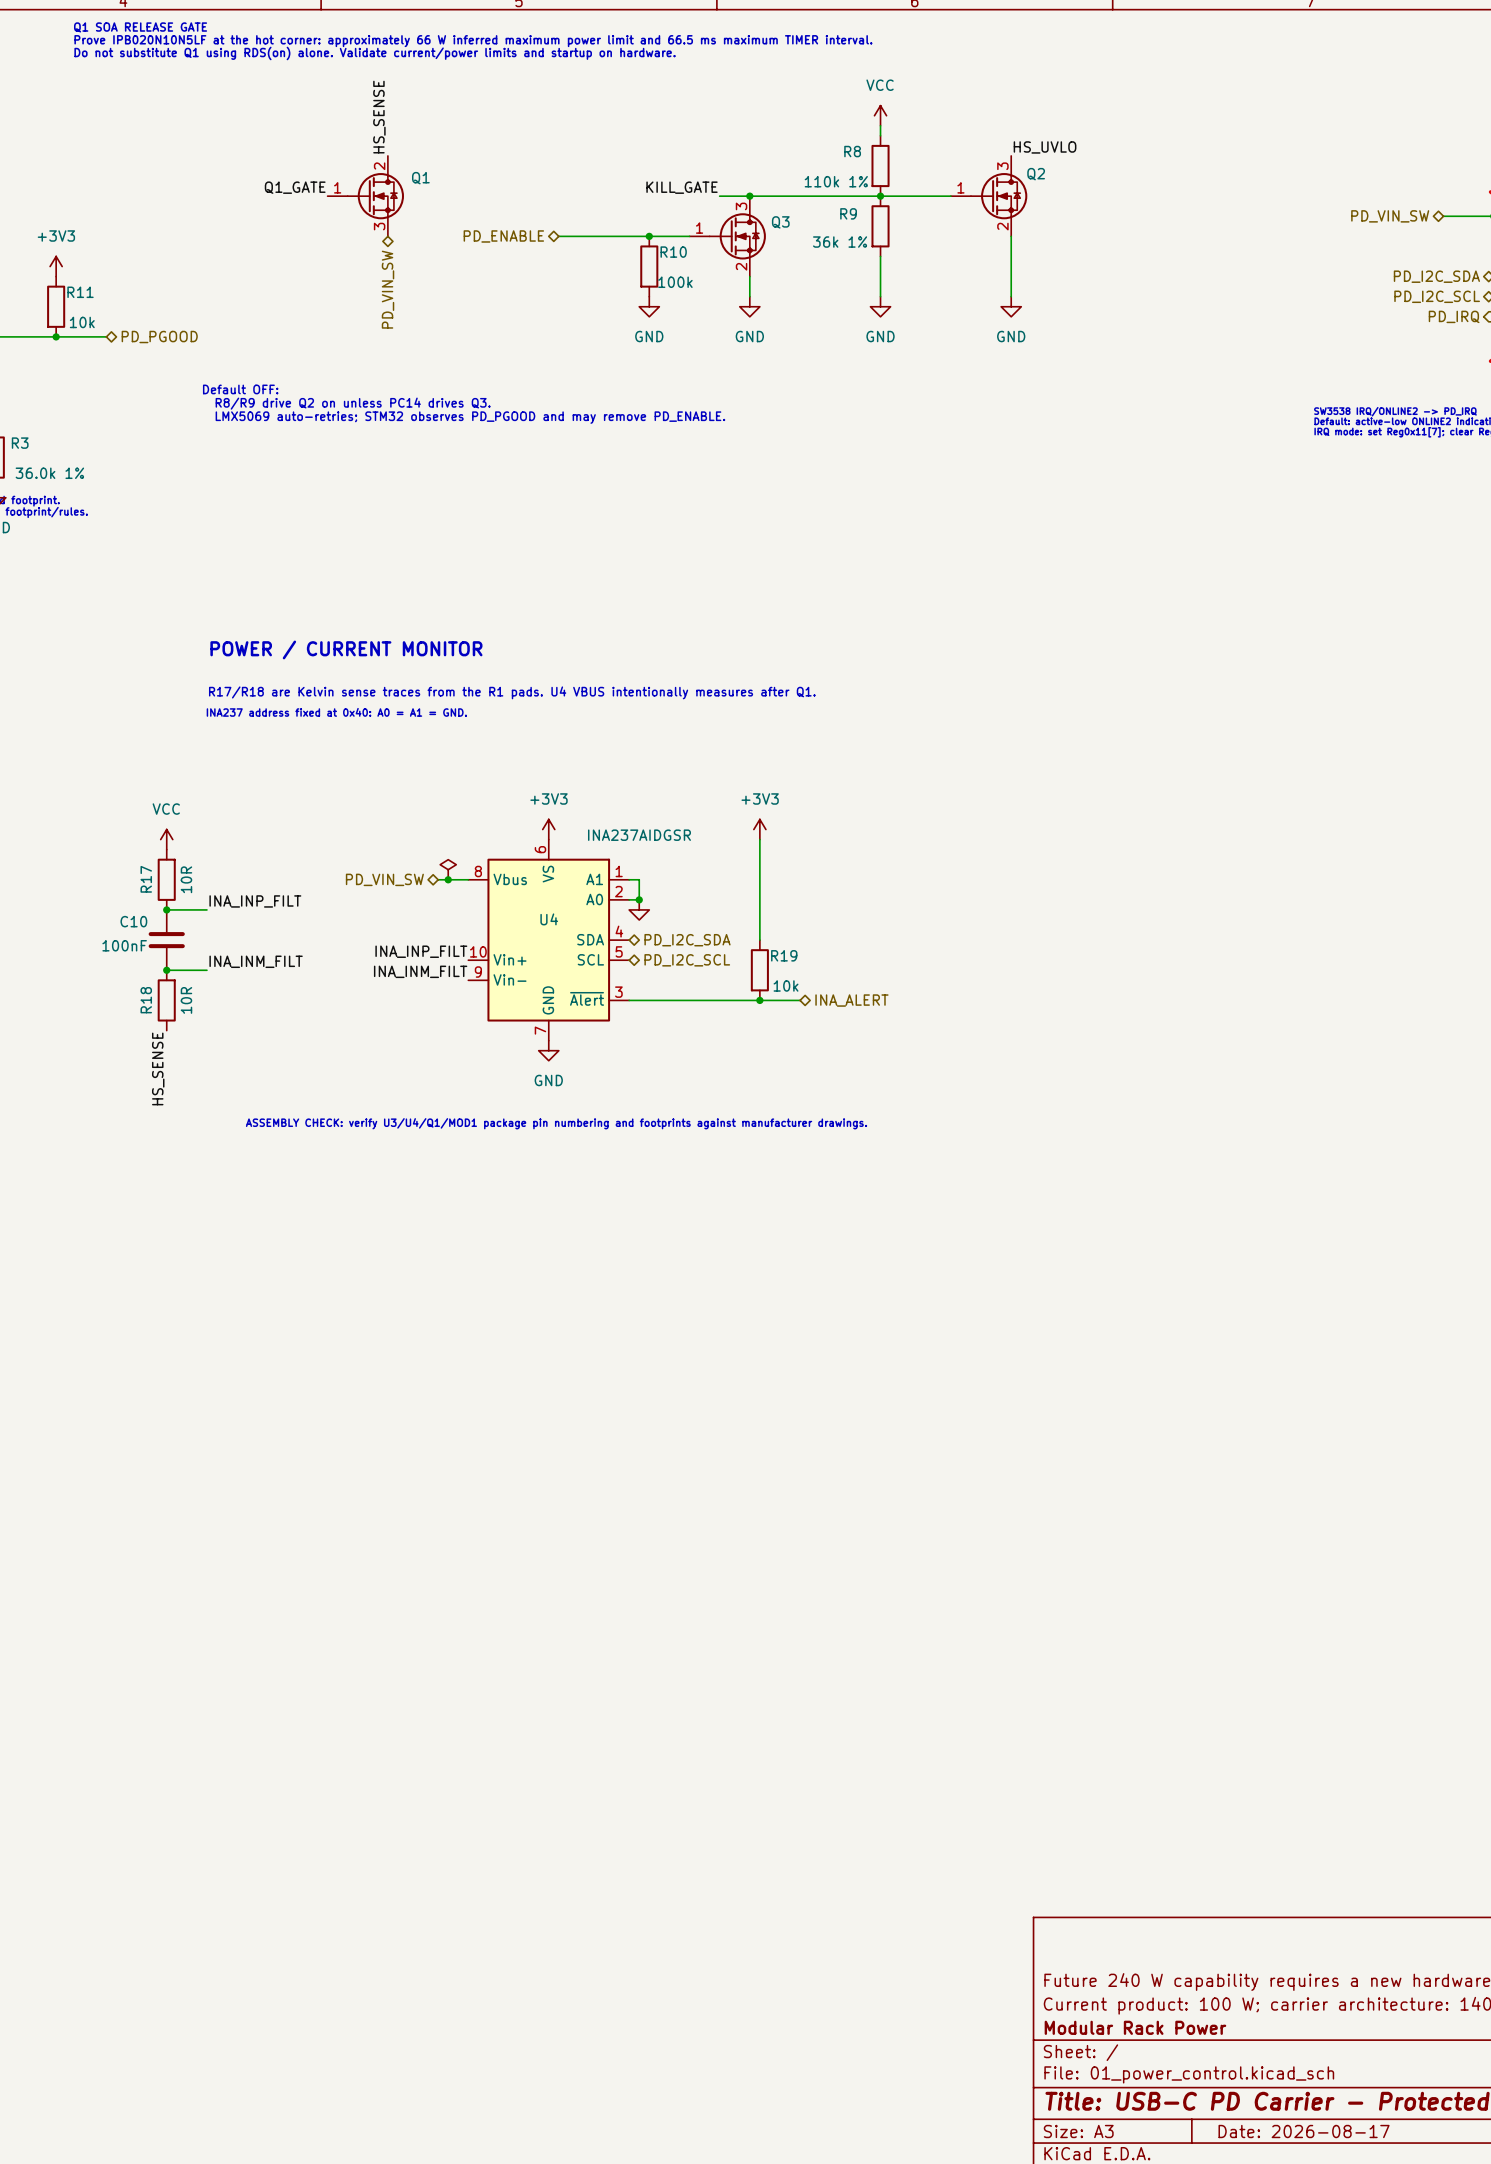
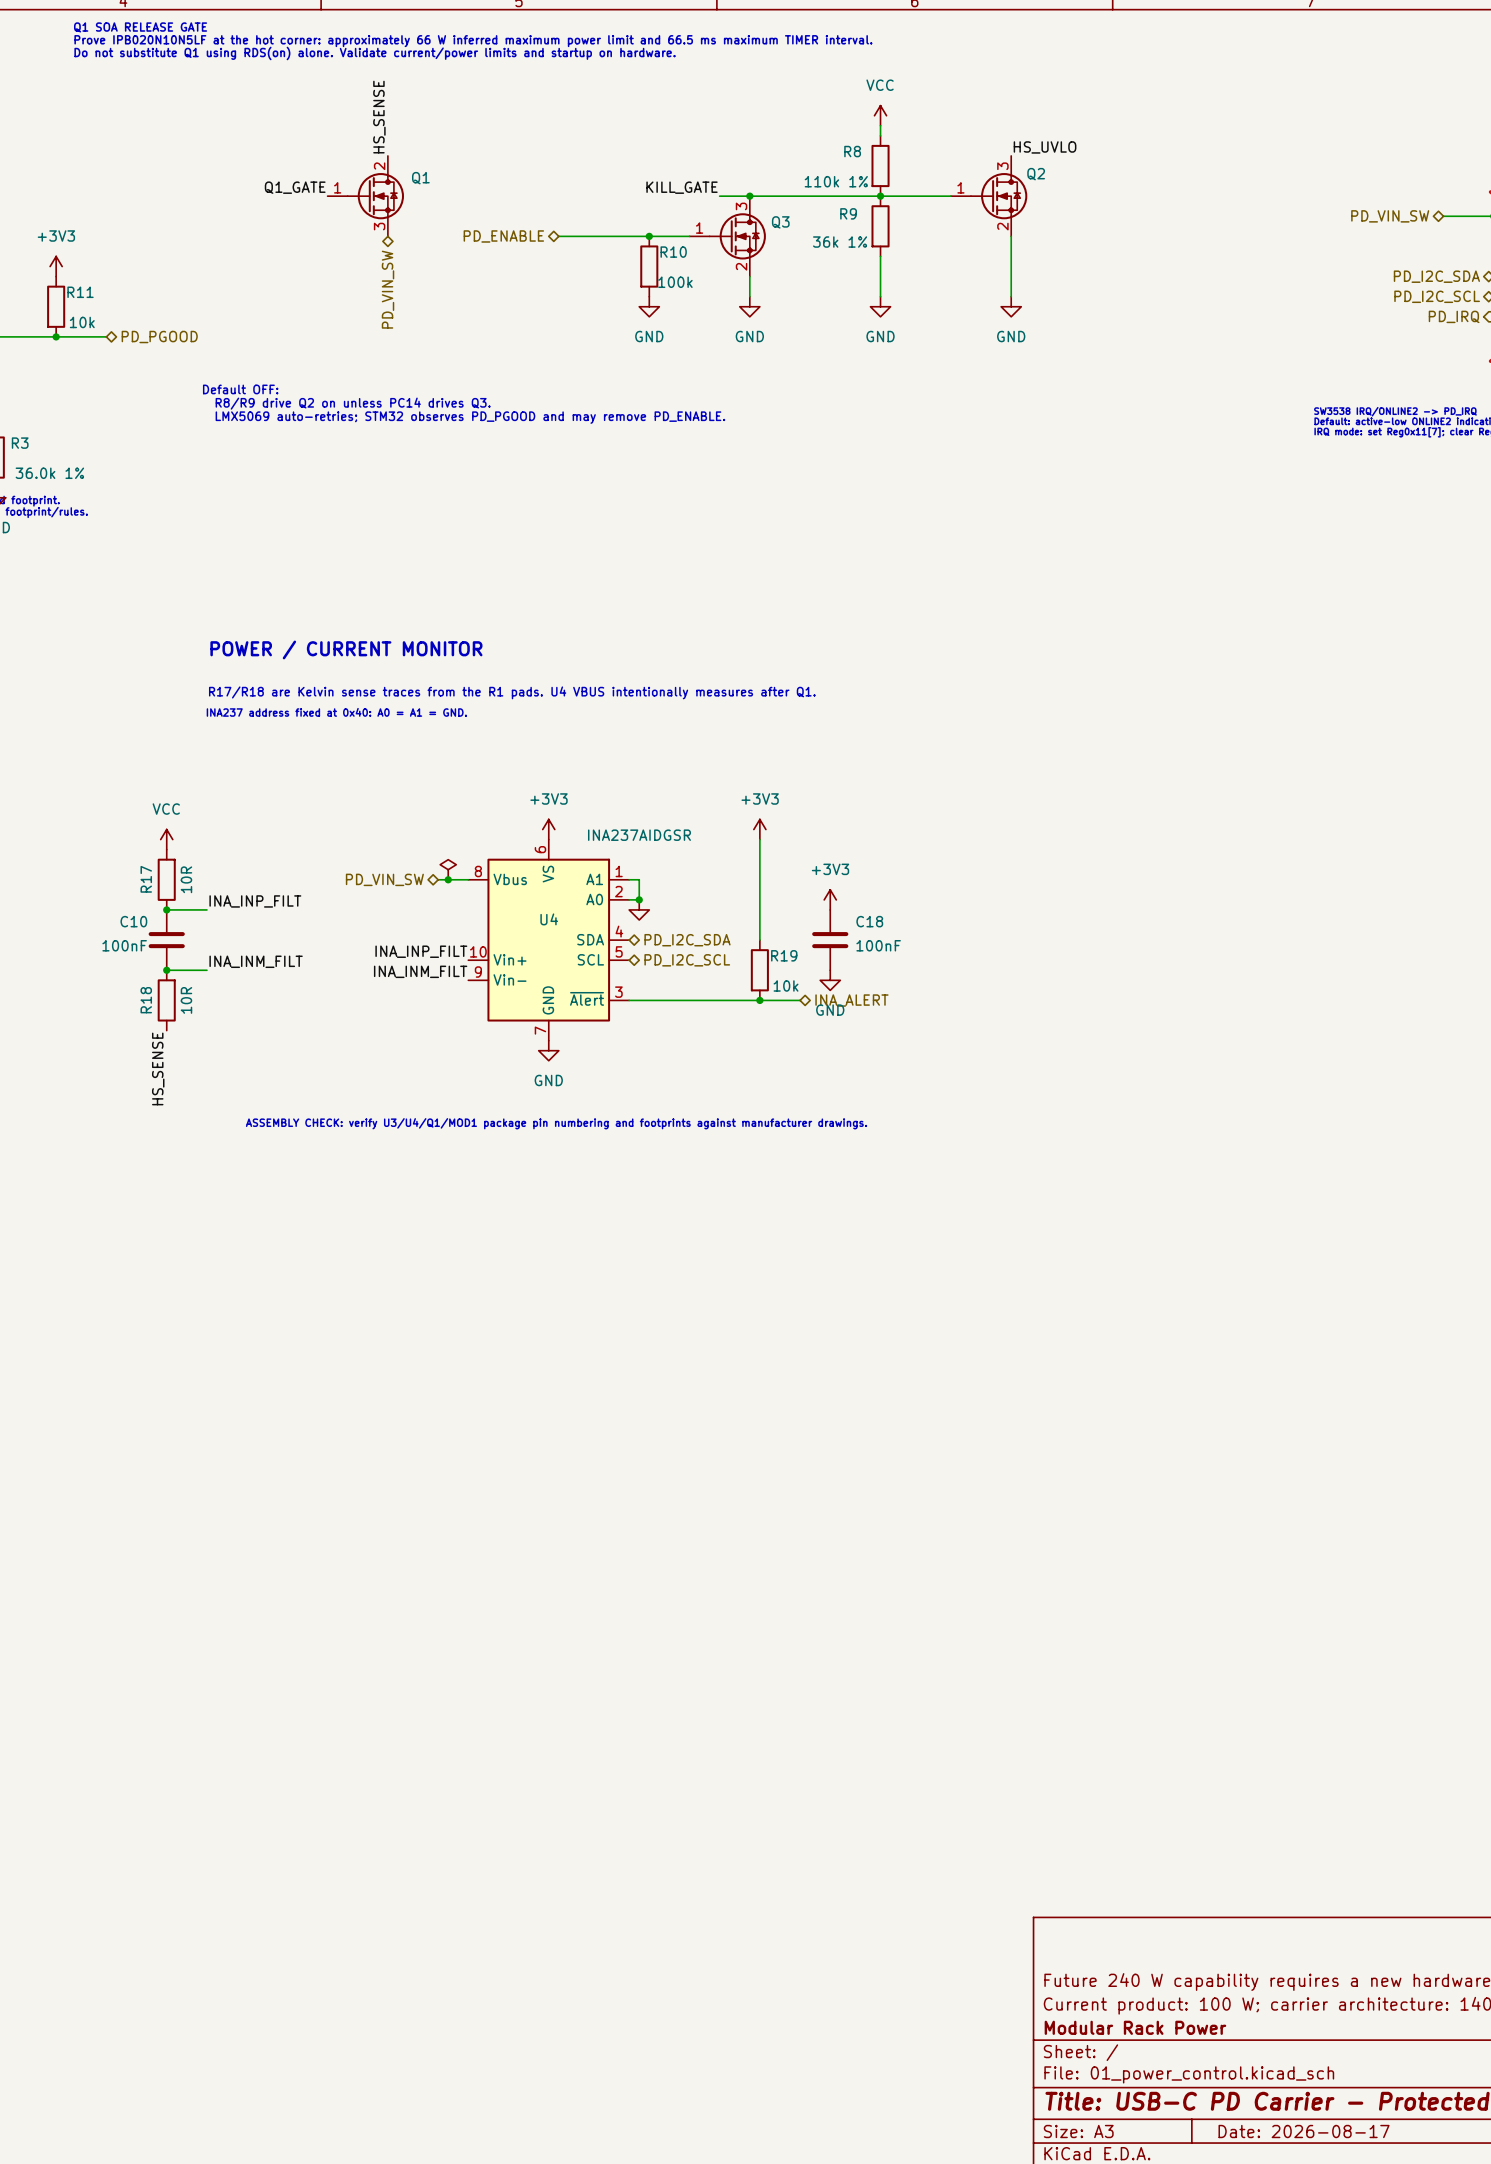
power symbol: none -> +3V3 (830, 899)
C18: none -> 100nF (830, 940)
power symbol: none -> GND (830, 980)

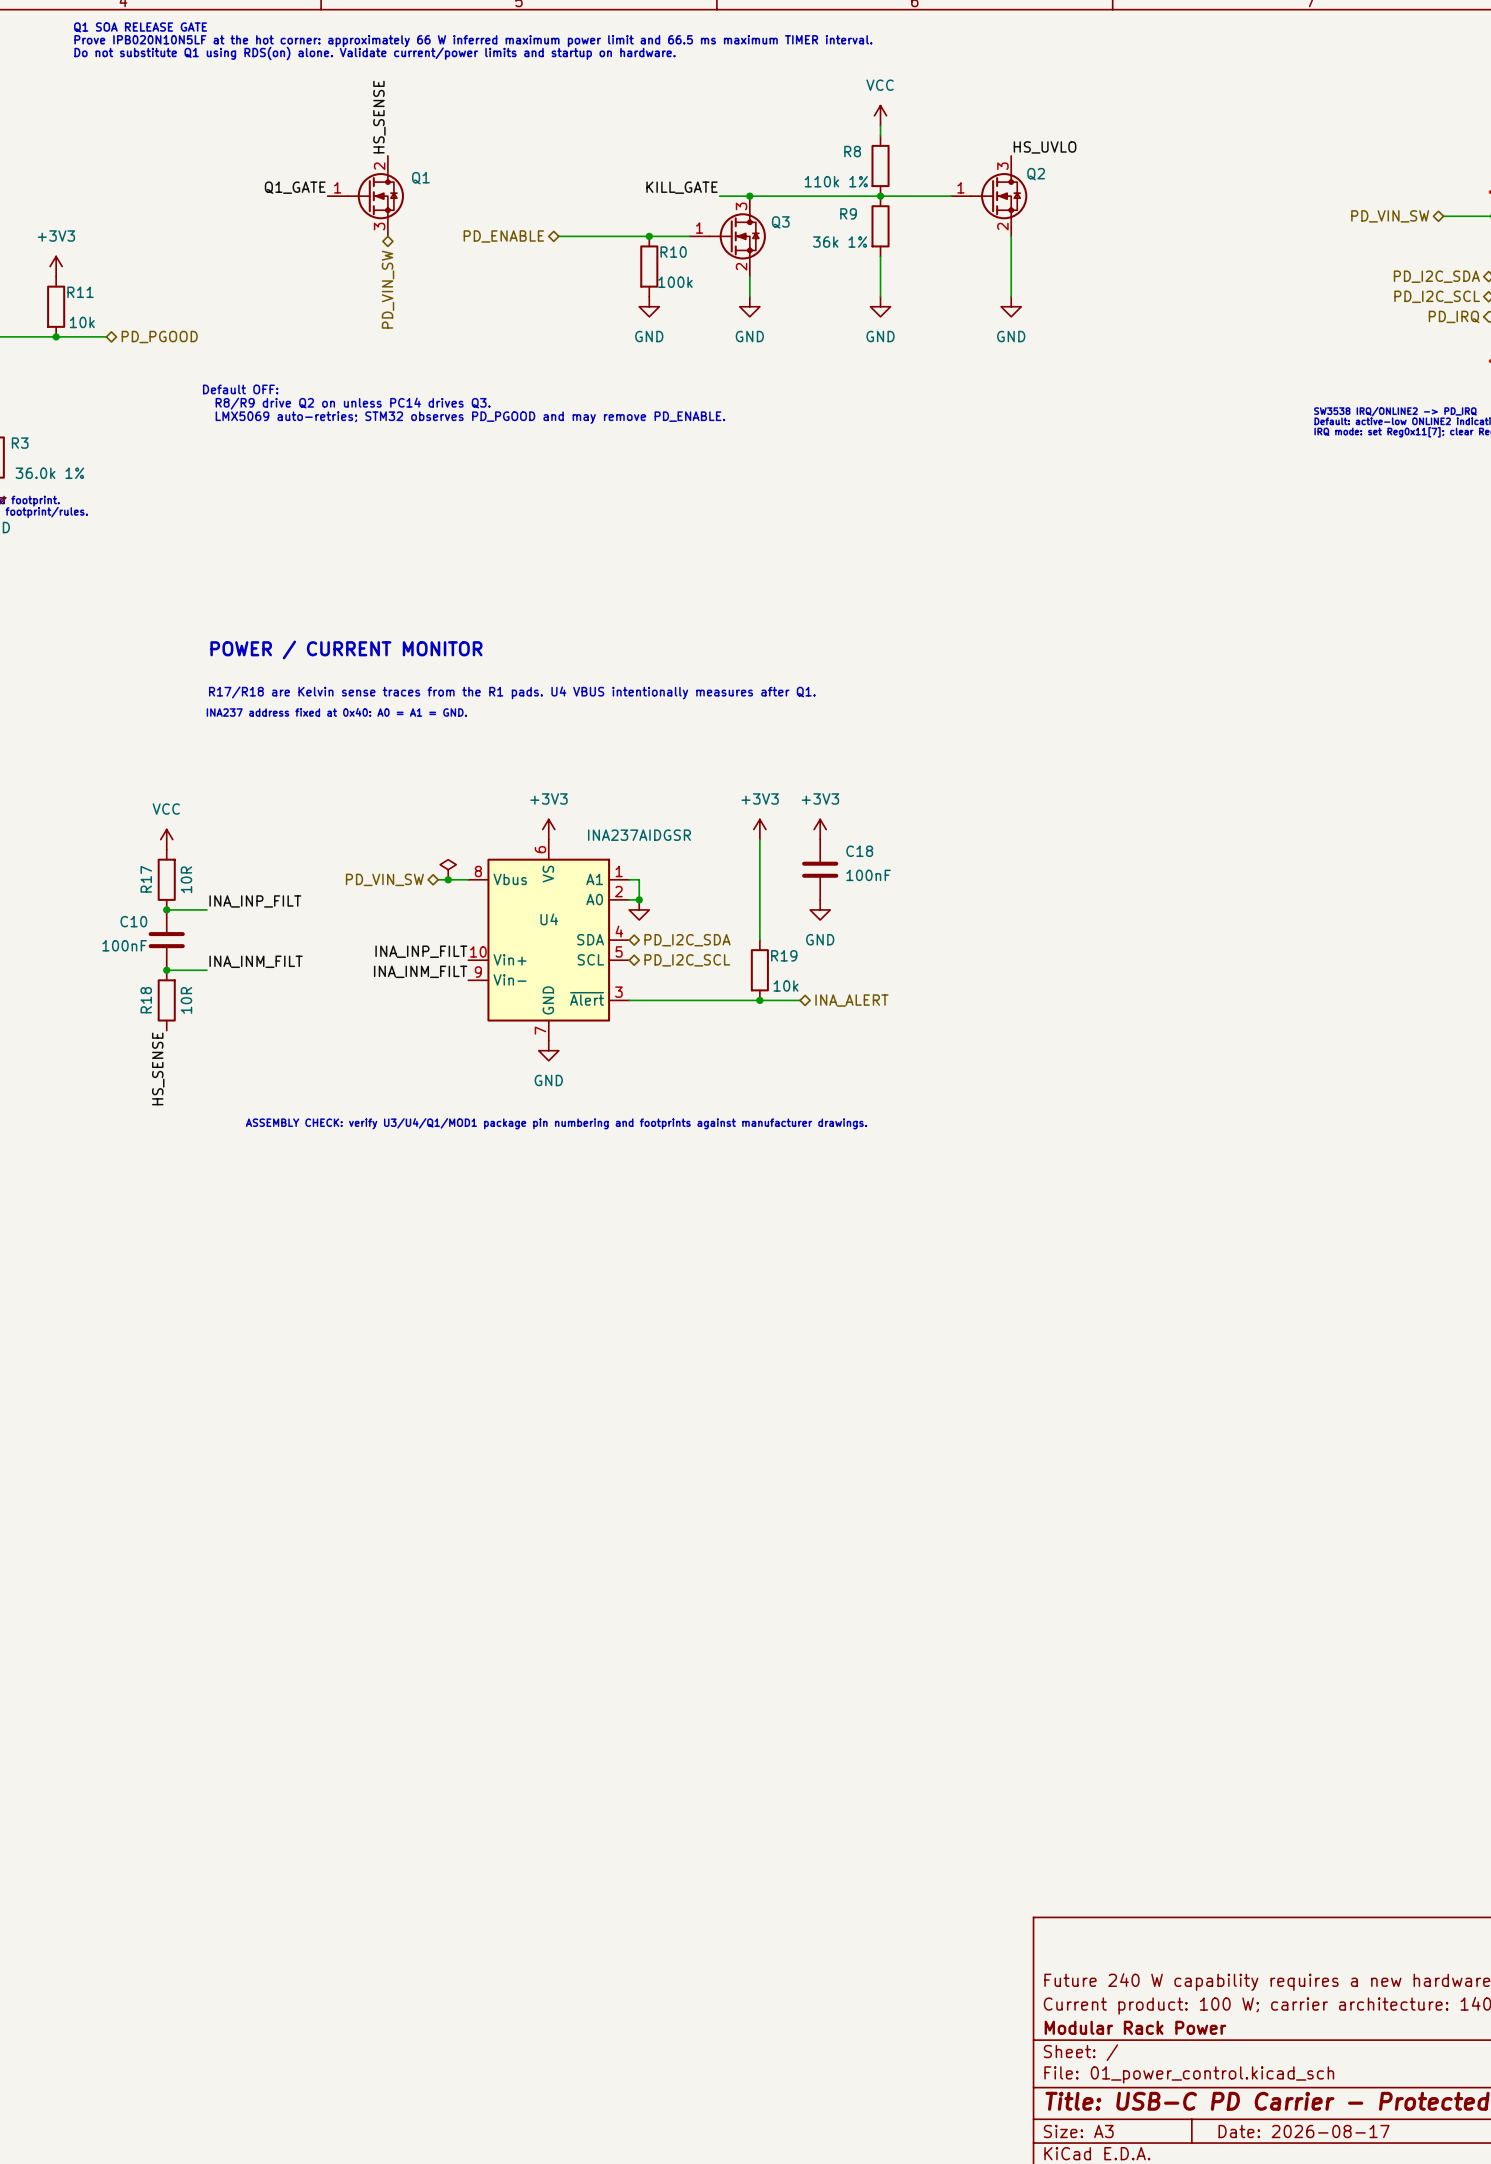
power symbol position: +3V3 (830, 899) -> +3V3 (820, 829)
C18 position: (830, 940) -> (820, 869)
power symbol position: GND (830, 980) -> GND (820, 909)

